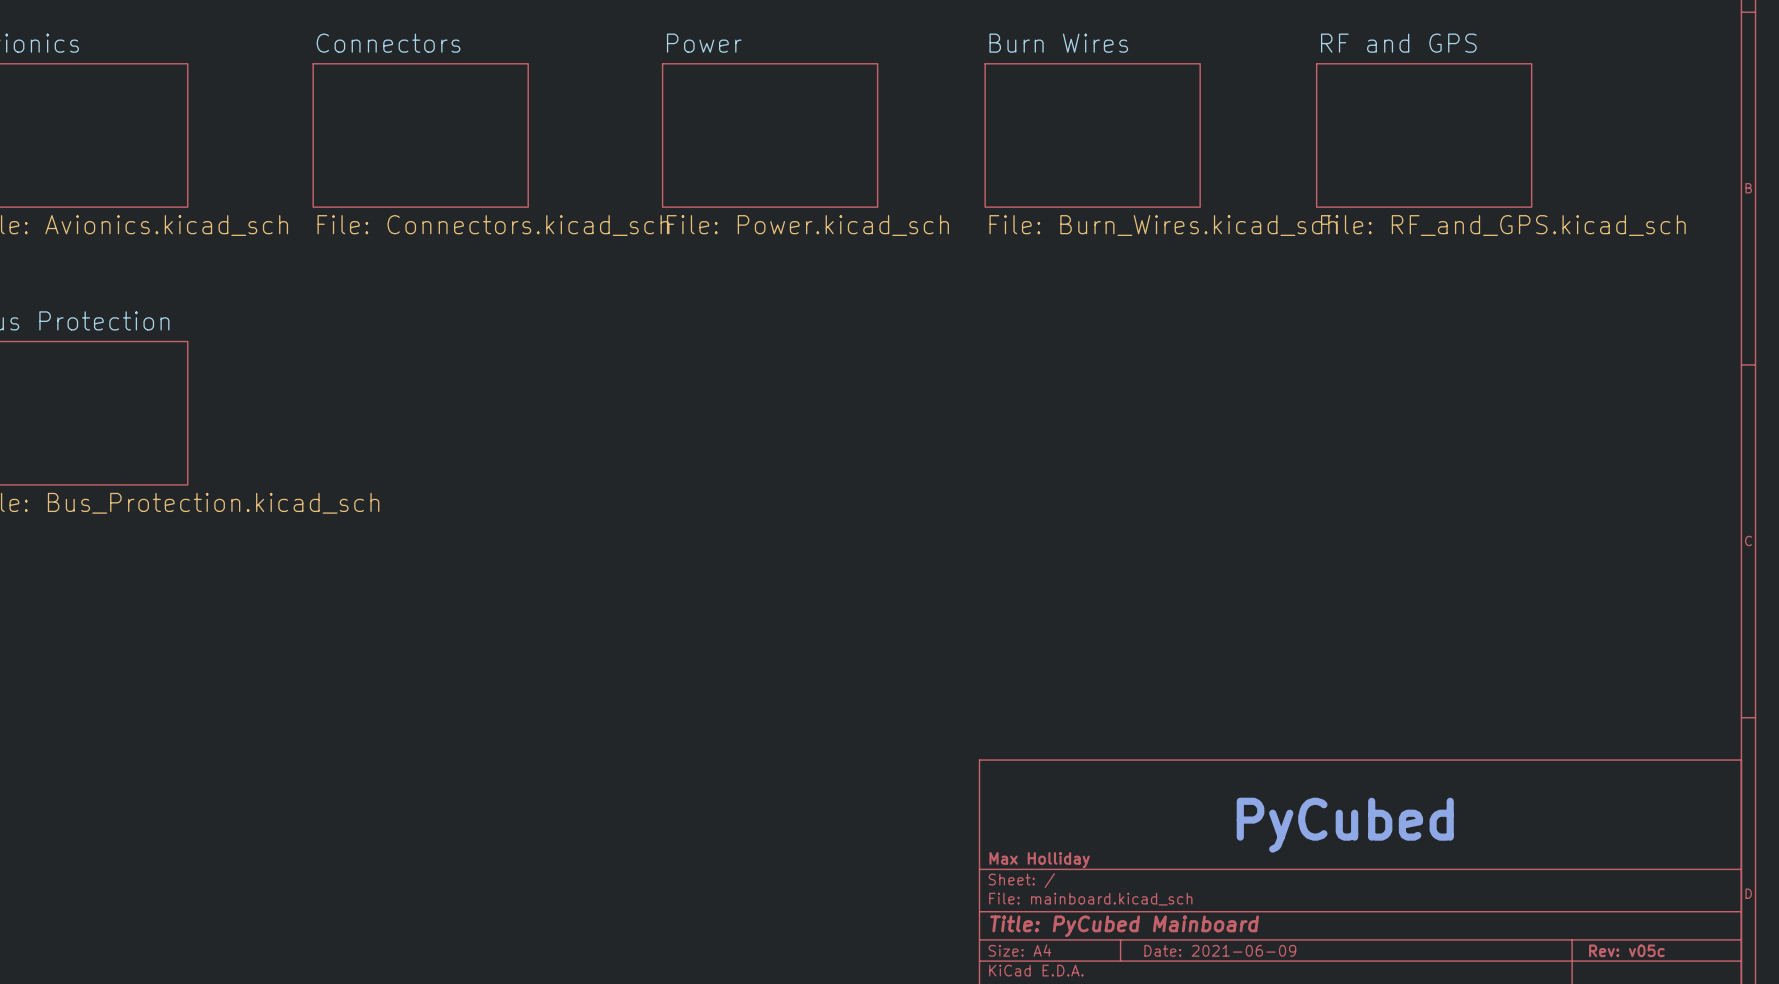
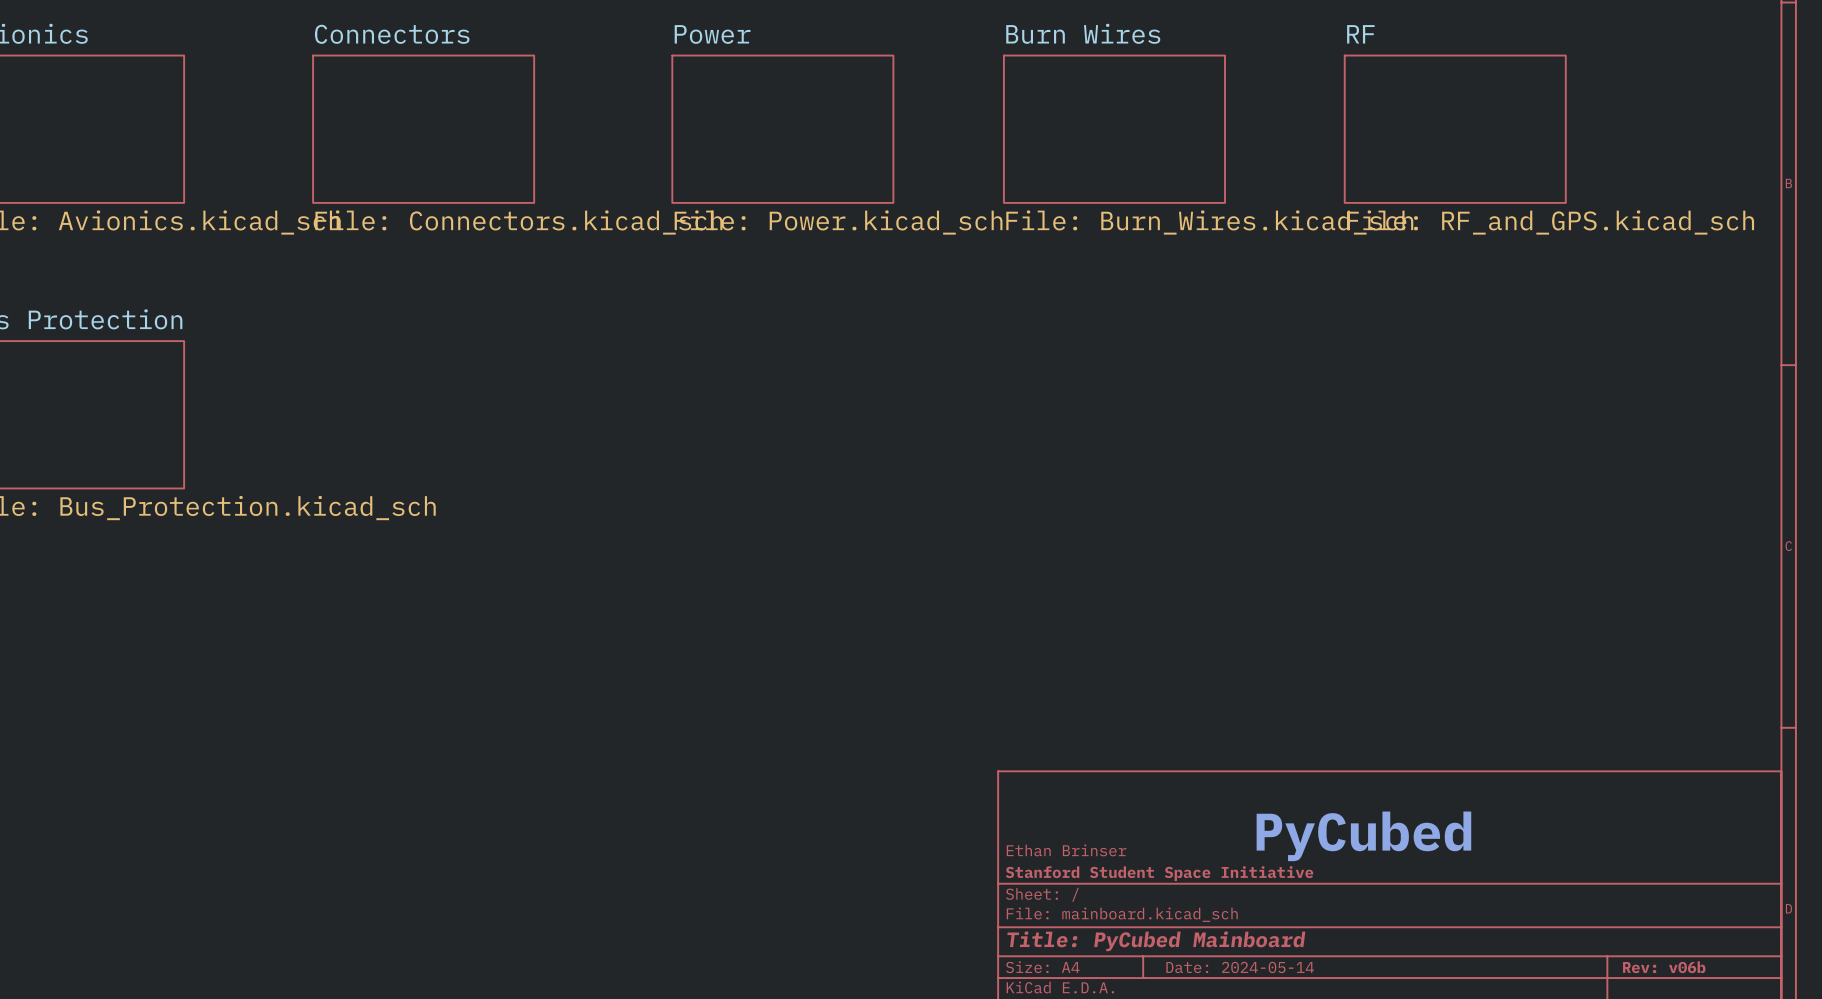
sheet RF and GPS name: RF and GPS (1398, 43) -> RF (1360, 34)
title block: none -> Ethan Brinser (1066, 850)
title block: Max Holliday (1039, 860) -> Stanford Student Space Initiative (1159, 873)
title block: Date: 2021-06-09 (1220, 950) -> Date: 2024-05-14 (1240, 967)
title block: Rev: v05c (1626, 950) -> Rev: v06b (1664, 967)

